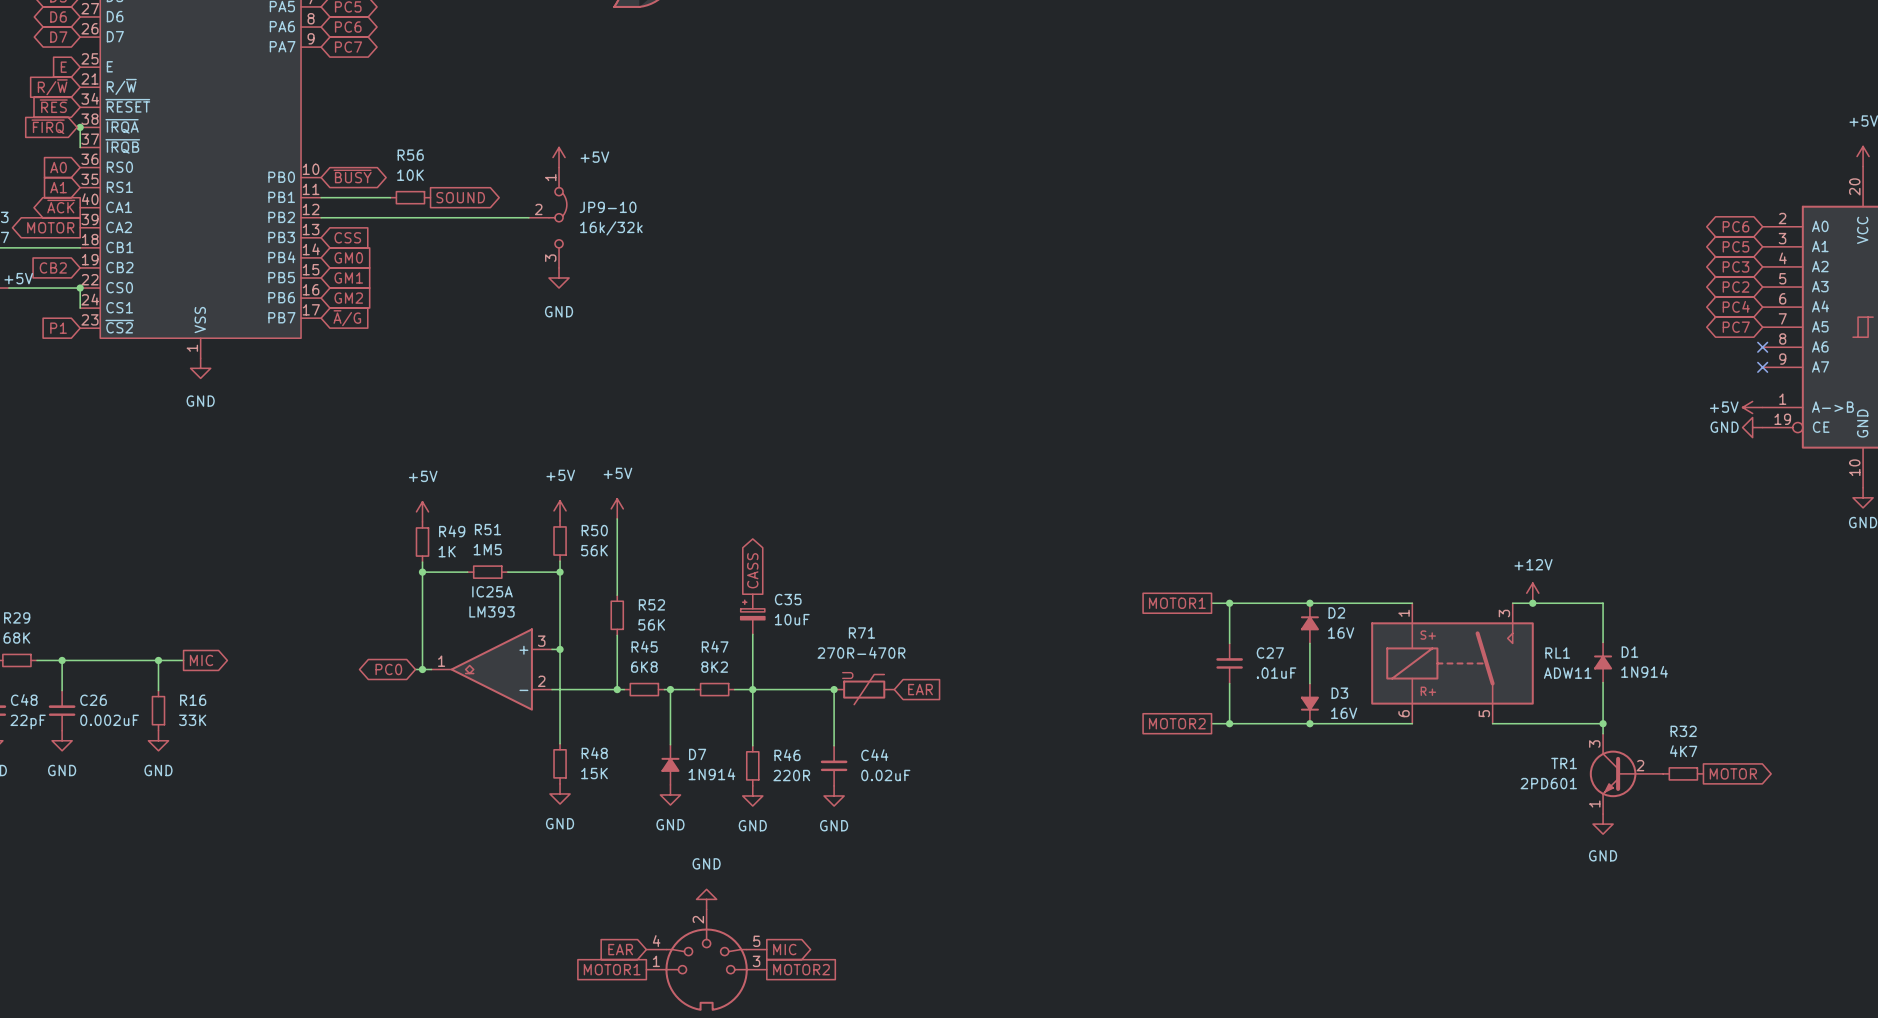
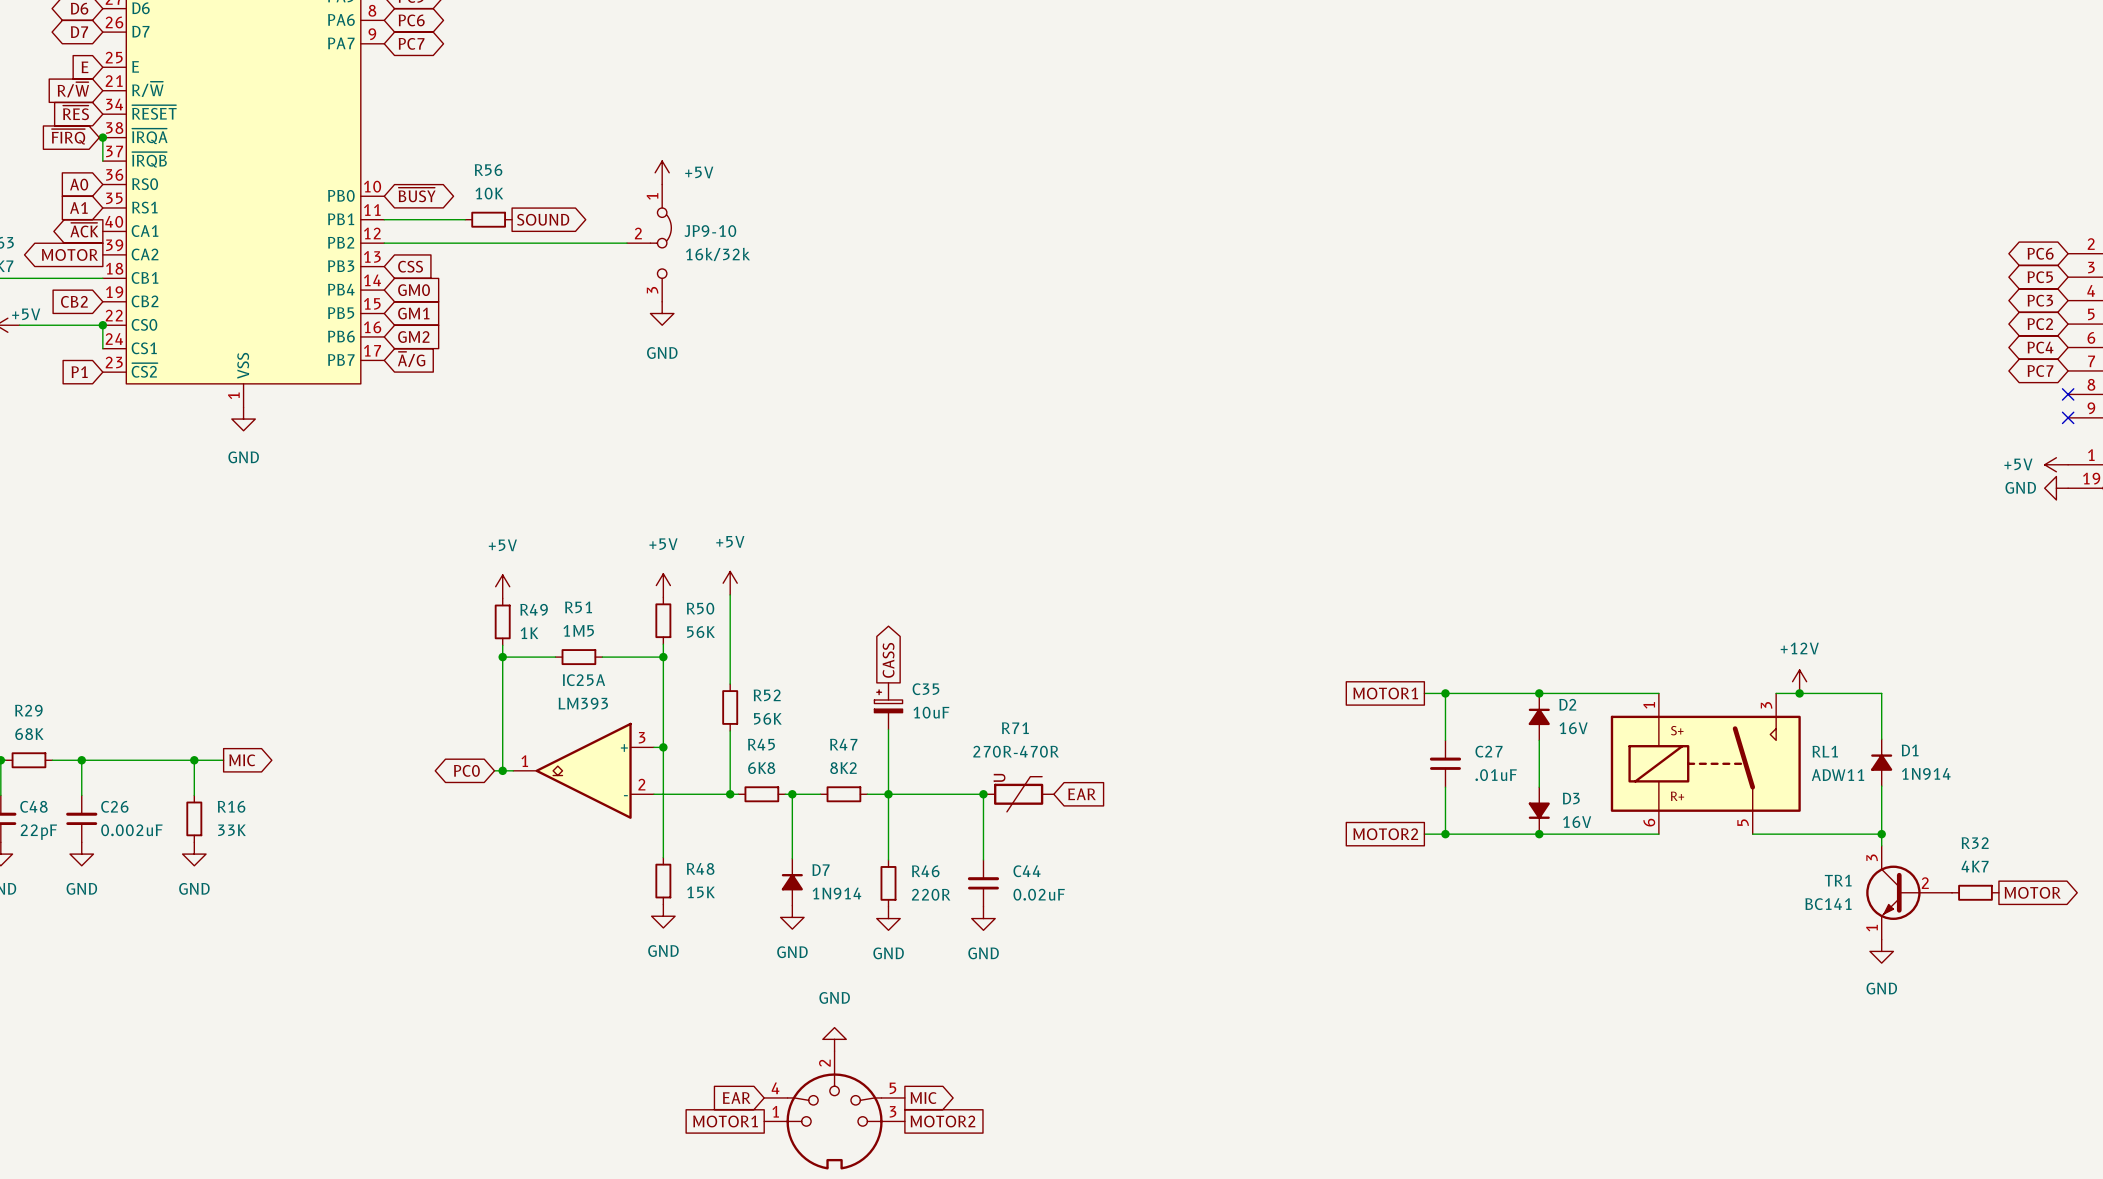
TR1 value: 2PD601 (1548, 783) -> BC141 (1828, 904)

